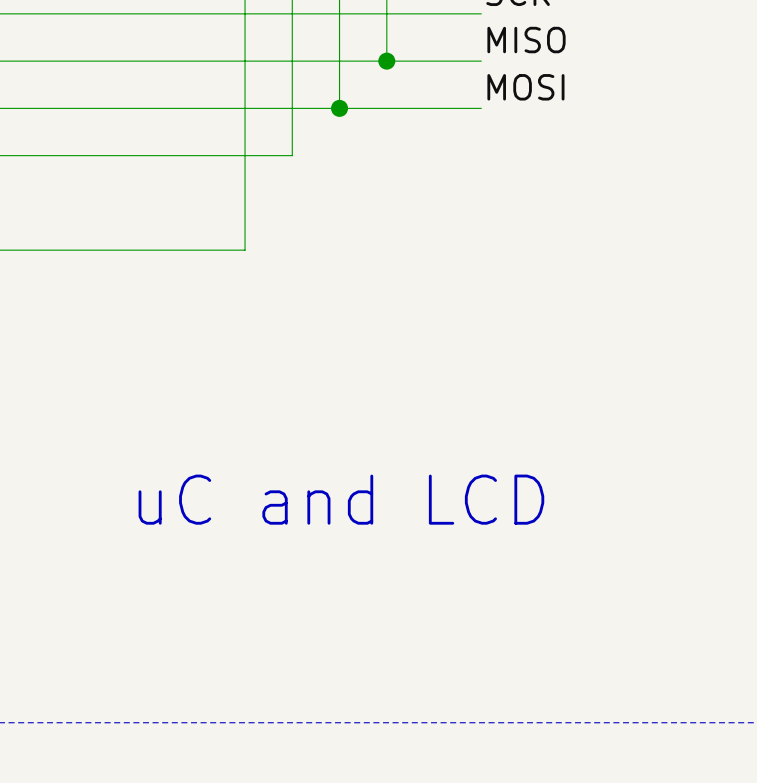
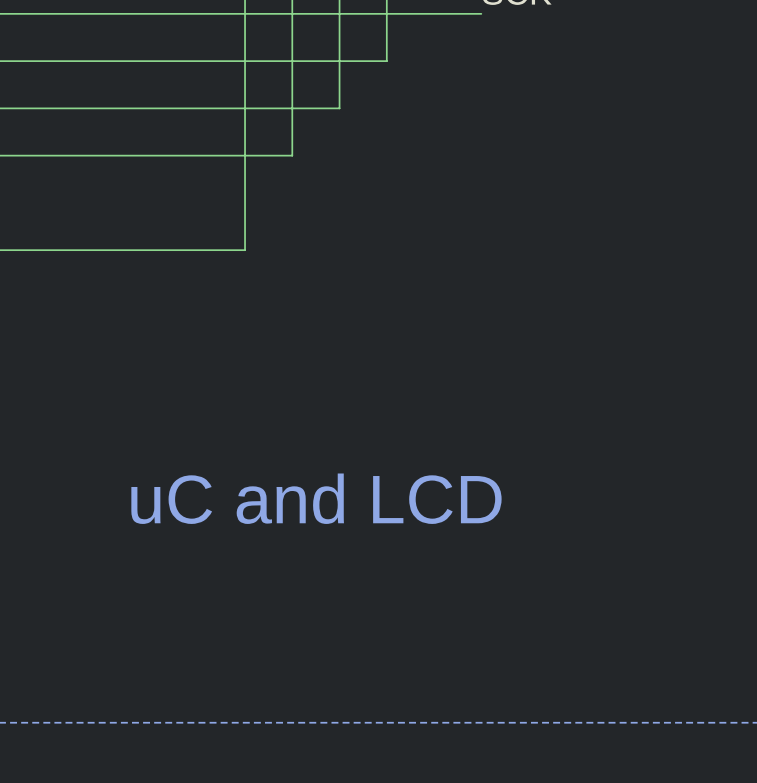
label: MISO (526, 40) -> none
wire: (386, 61) (481, 61) -> none
junction: (386, 61) -> none
label: MOSI (525, 87) -> none
wire: (339, 108) (481, 108) -> none
junction: (339, 108) -> none

